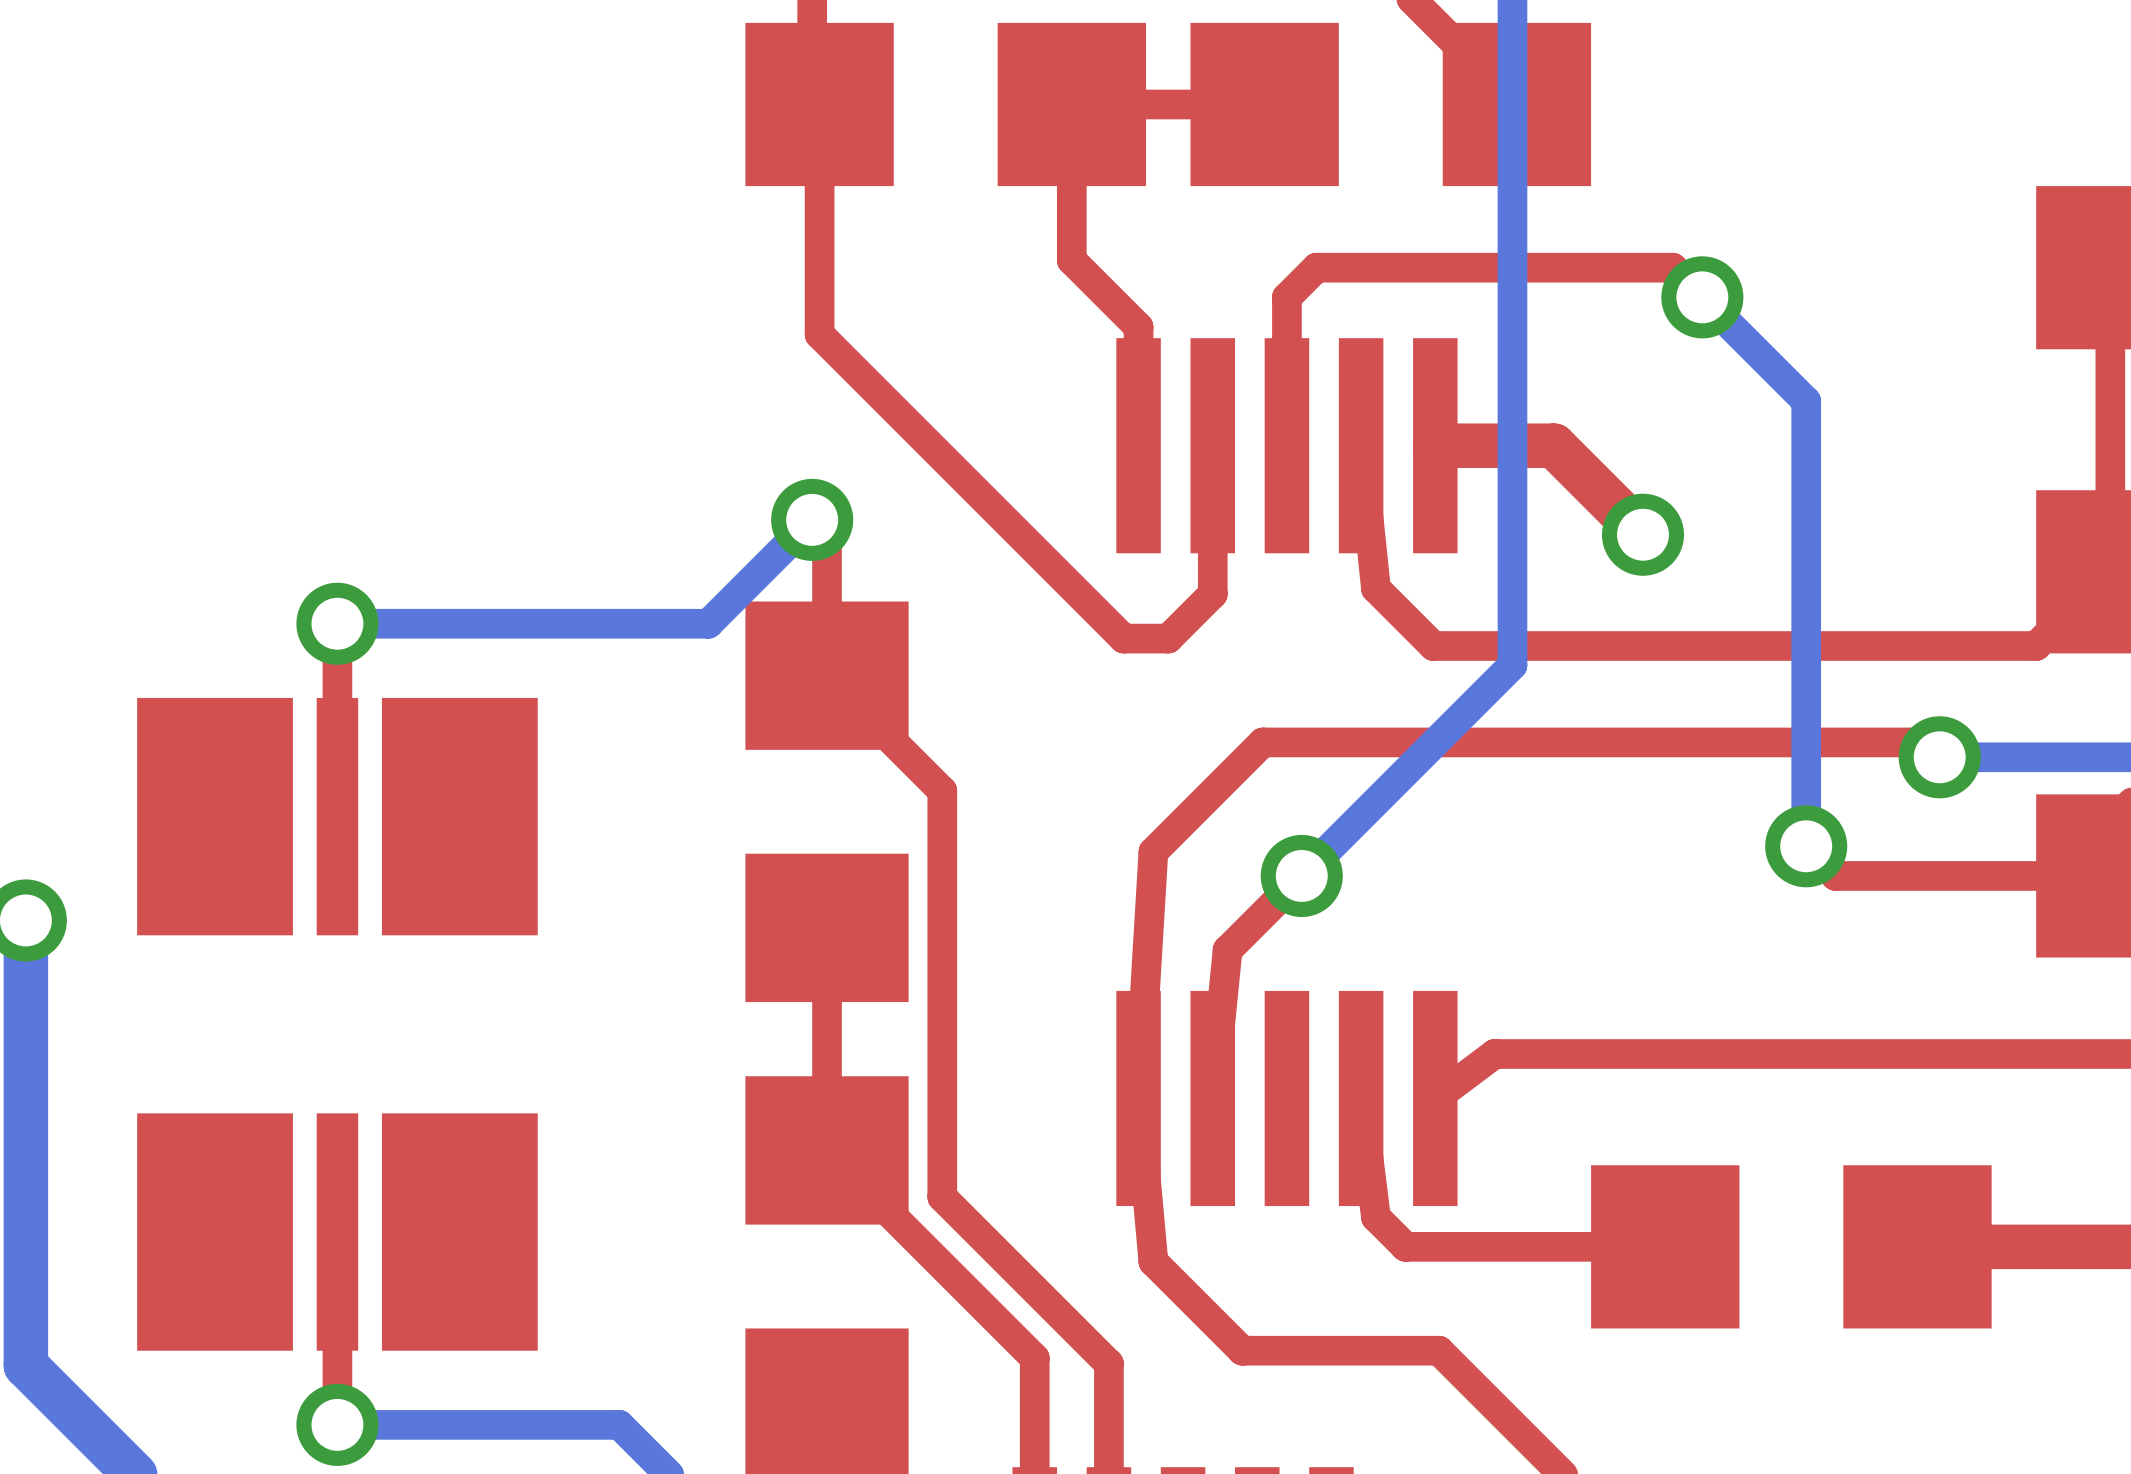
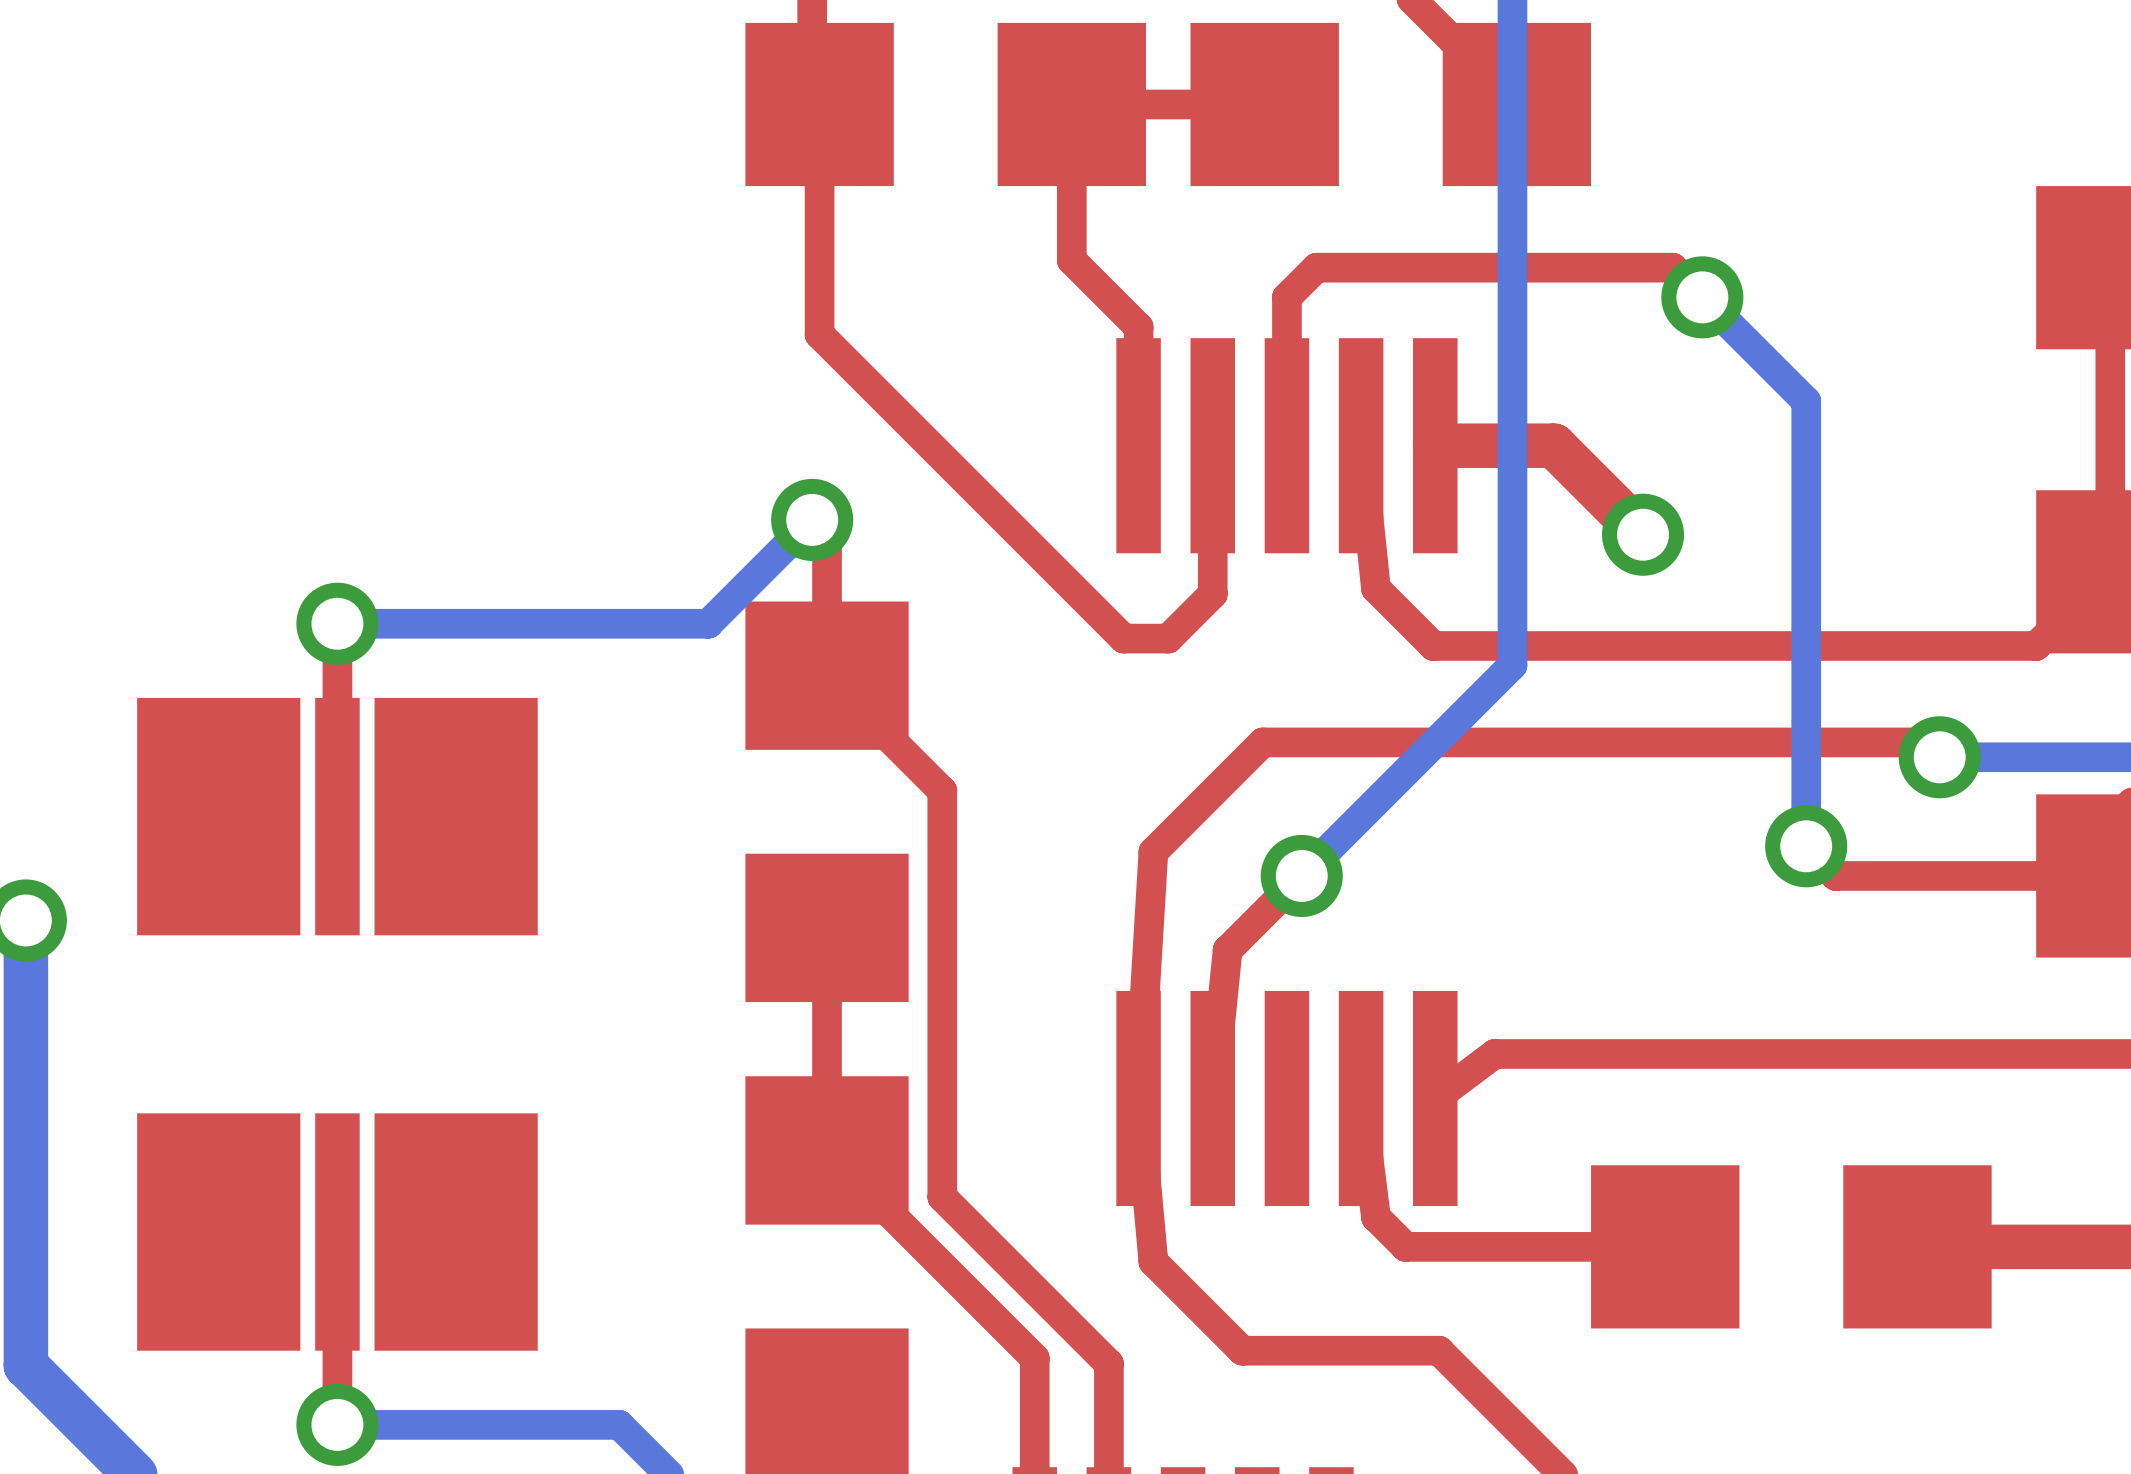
part footprint: [137, 697, 538, 1351] -> [137, 697, 538, 1351]

